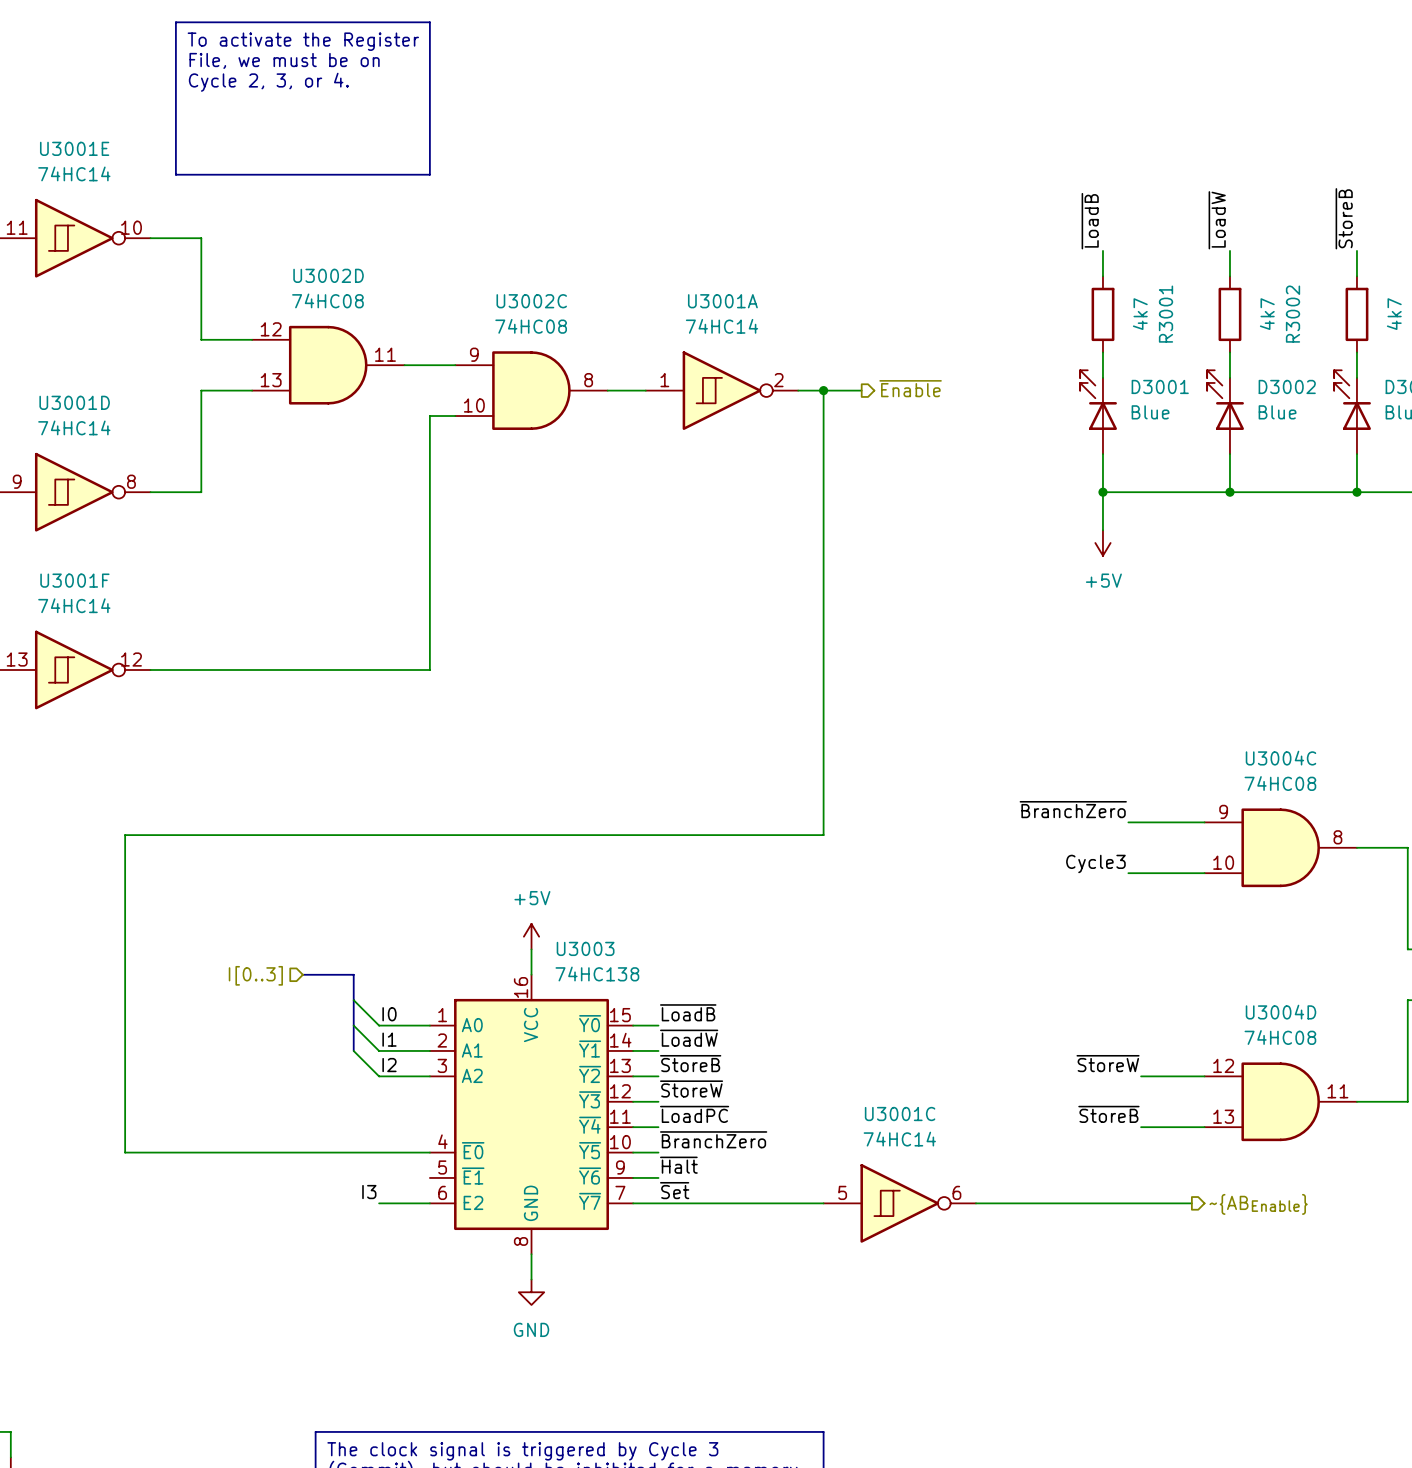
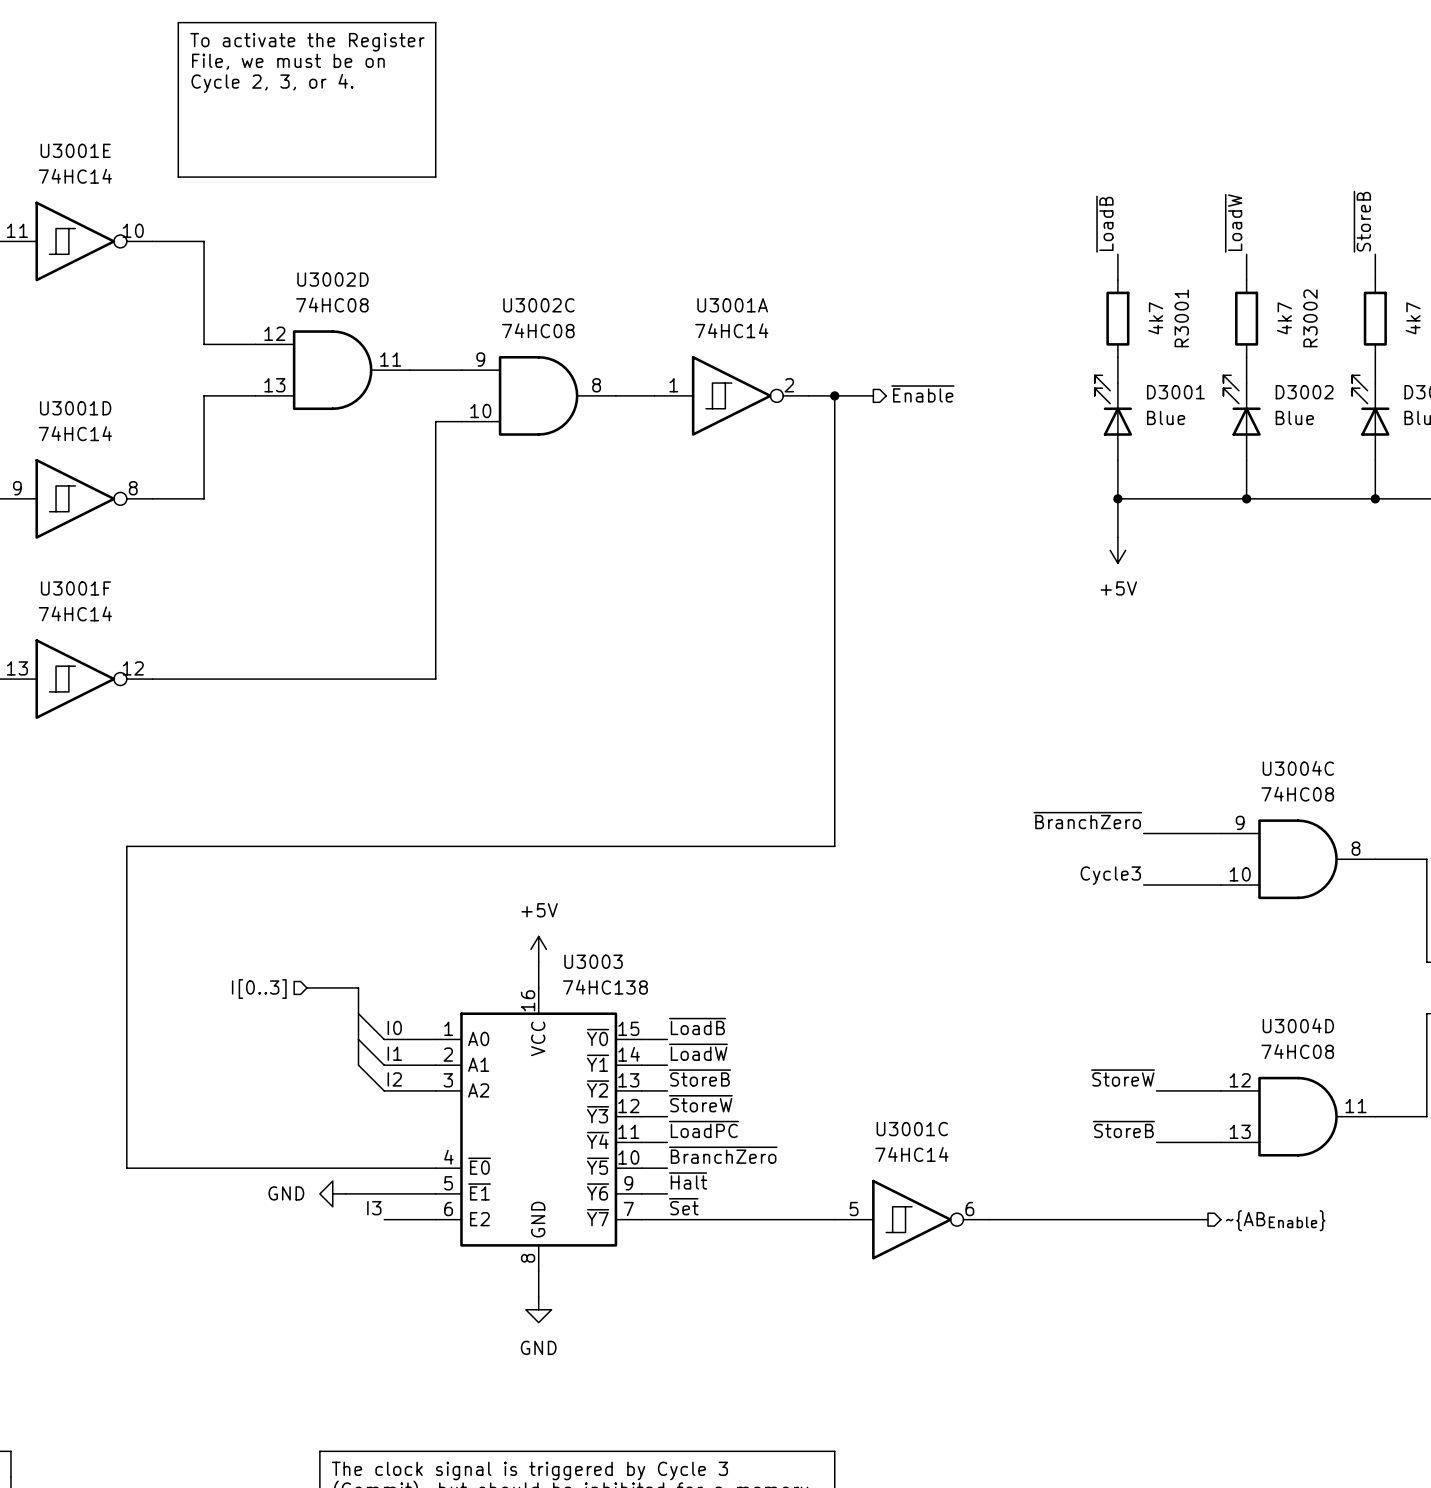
power symbol: none -> GND (332, 1193)
wire: none -> (345, 1193) (435, 1193)

